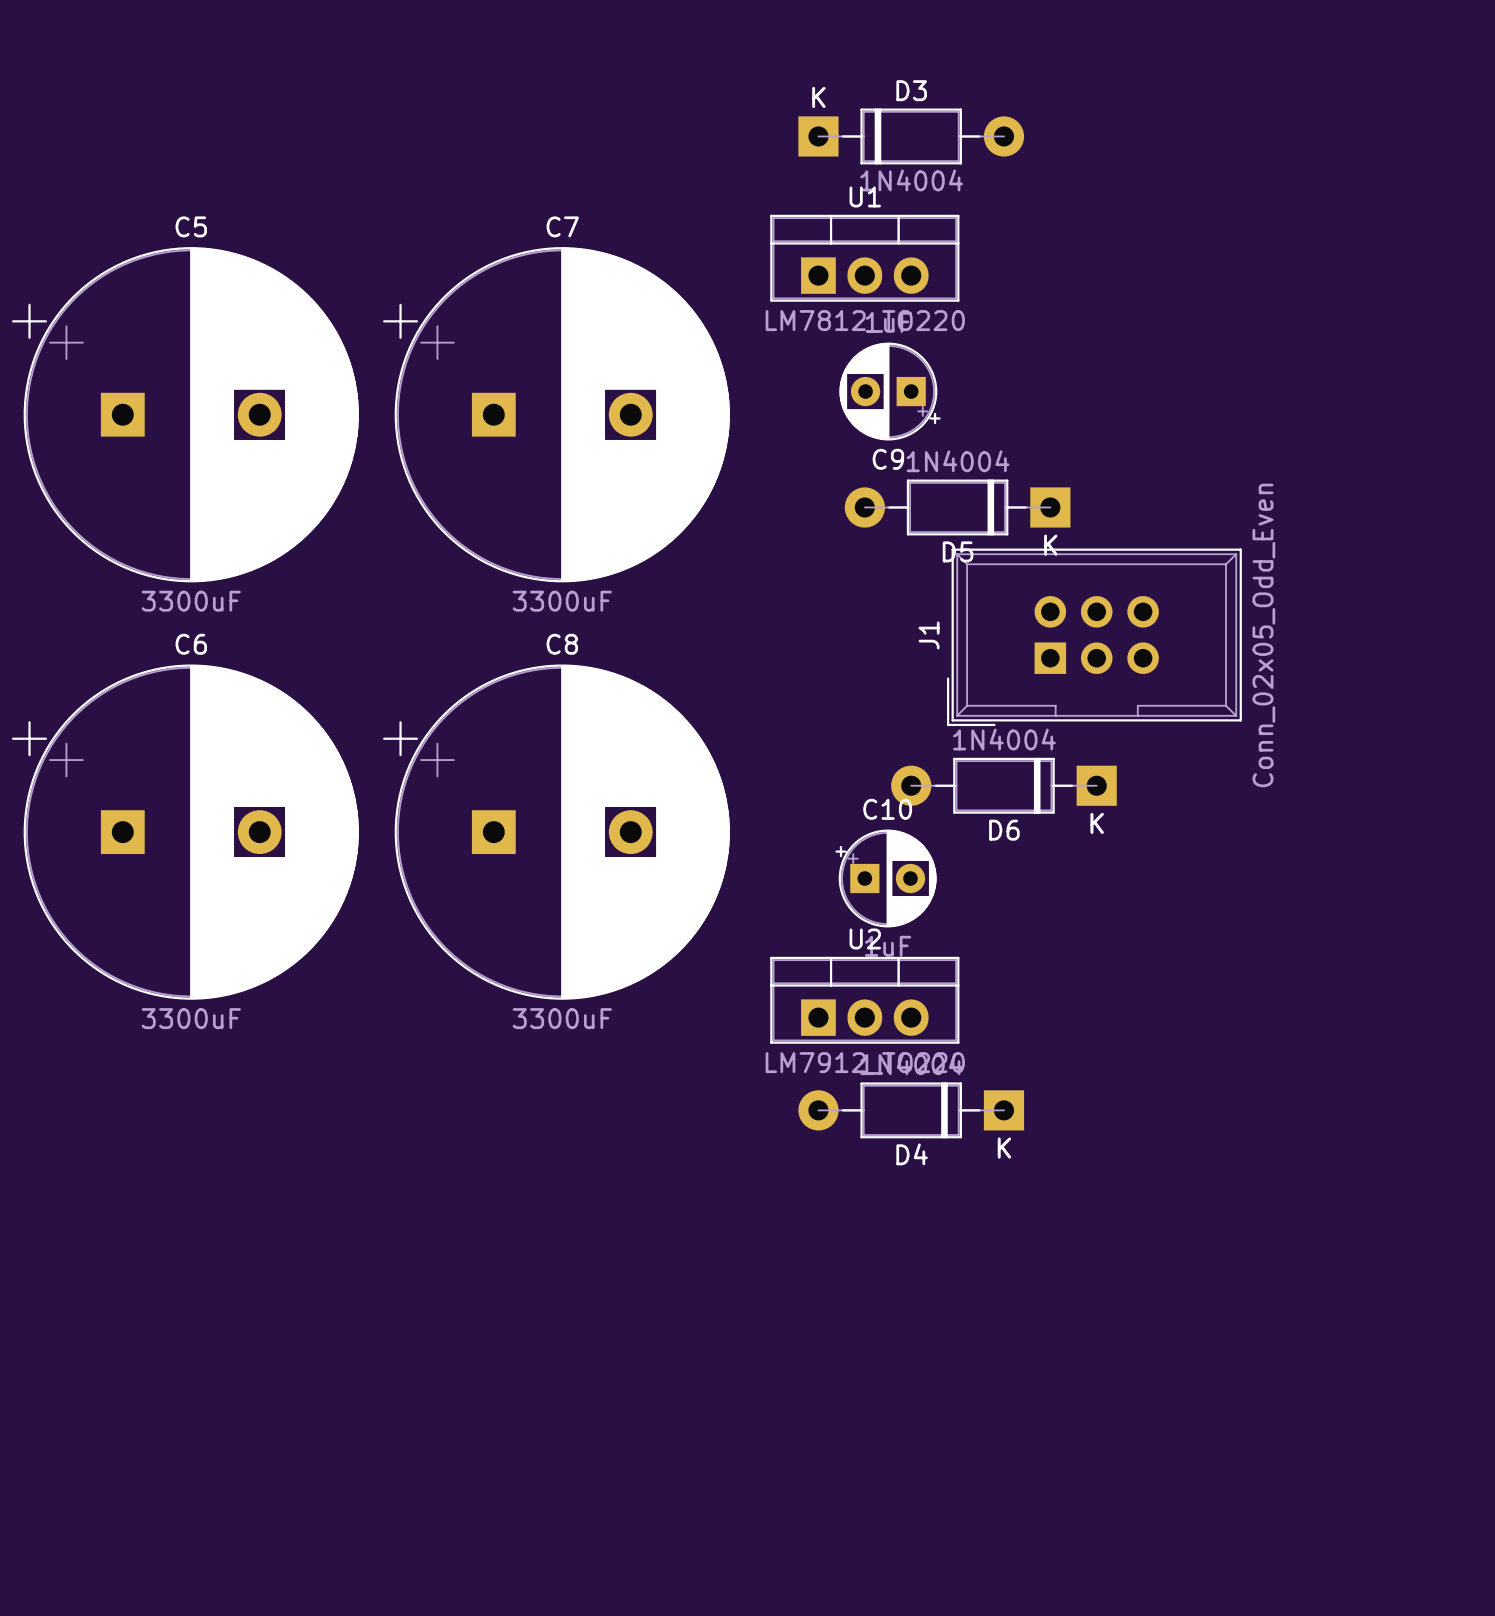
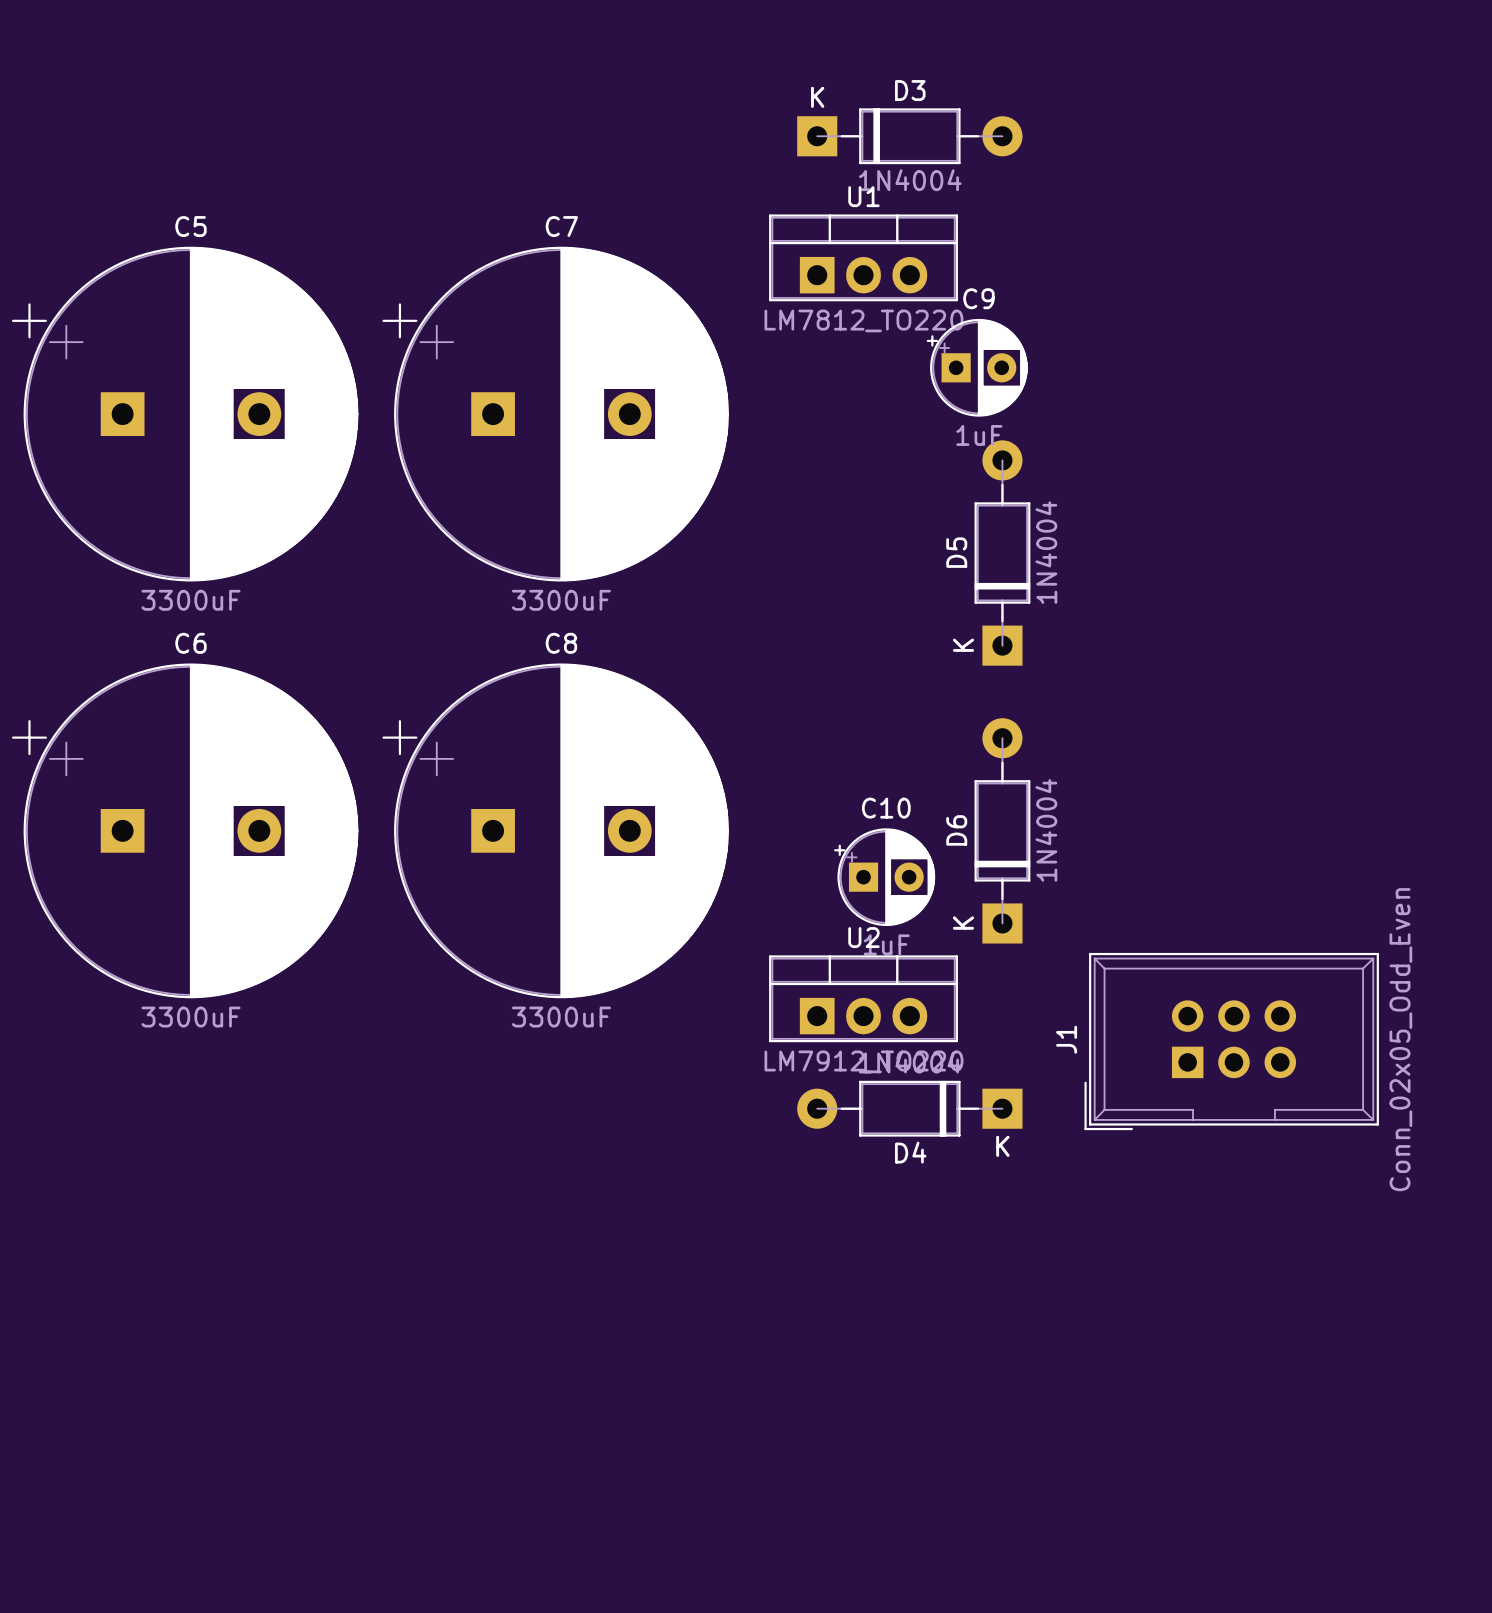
C9 rotation: 0° (890, 391) -> 180° (977, 367)
C9 position: (890, 391) -> (977, 367)
D5 rotation: 0° (957, 507) -> 90° clockwise (1002, 553)
J1 position: (1094, 637) -> (1231, 1041)
D6 rotation: 0° (1003, 785) -> 90° clockwise (1002, 830)

